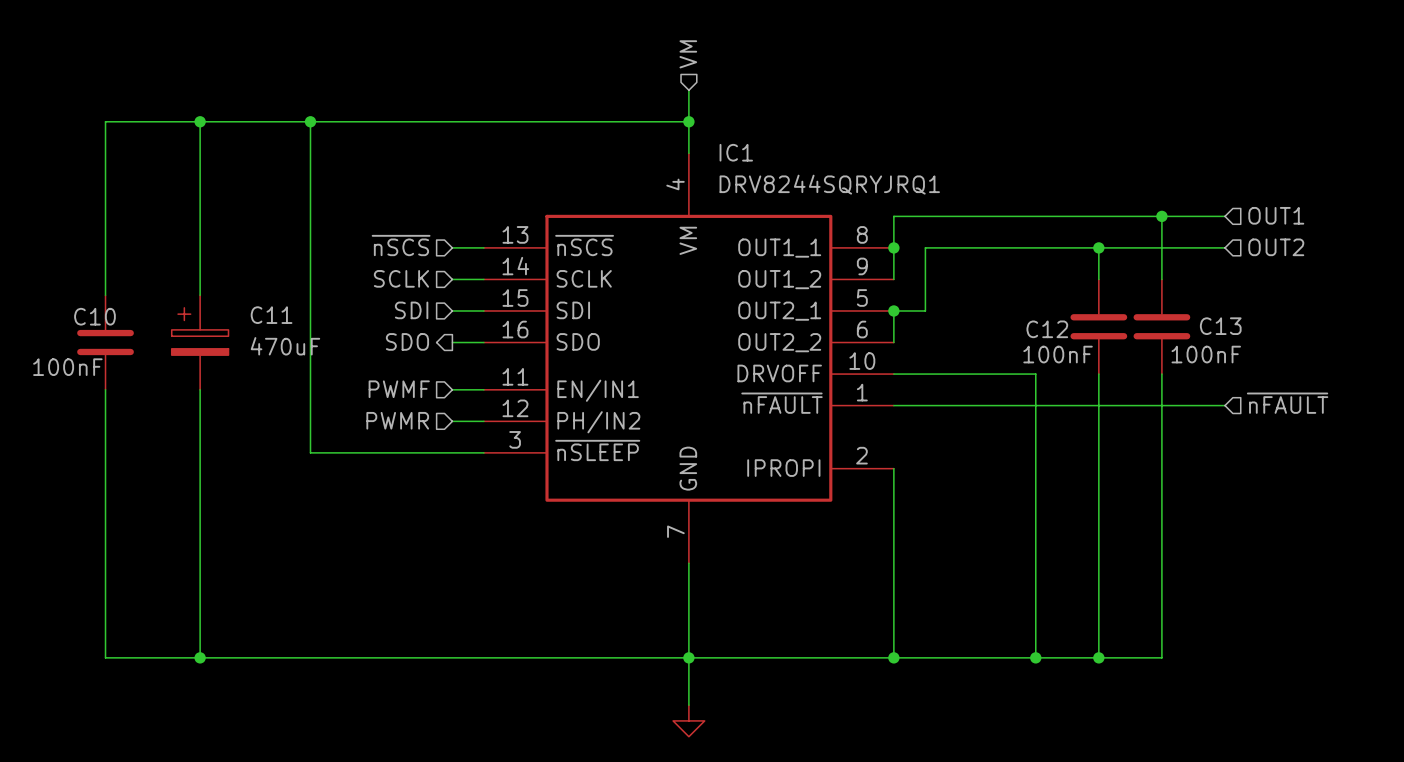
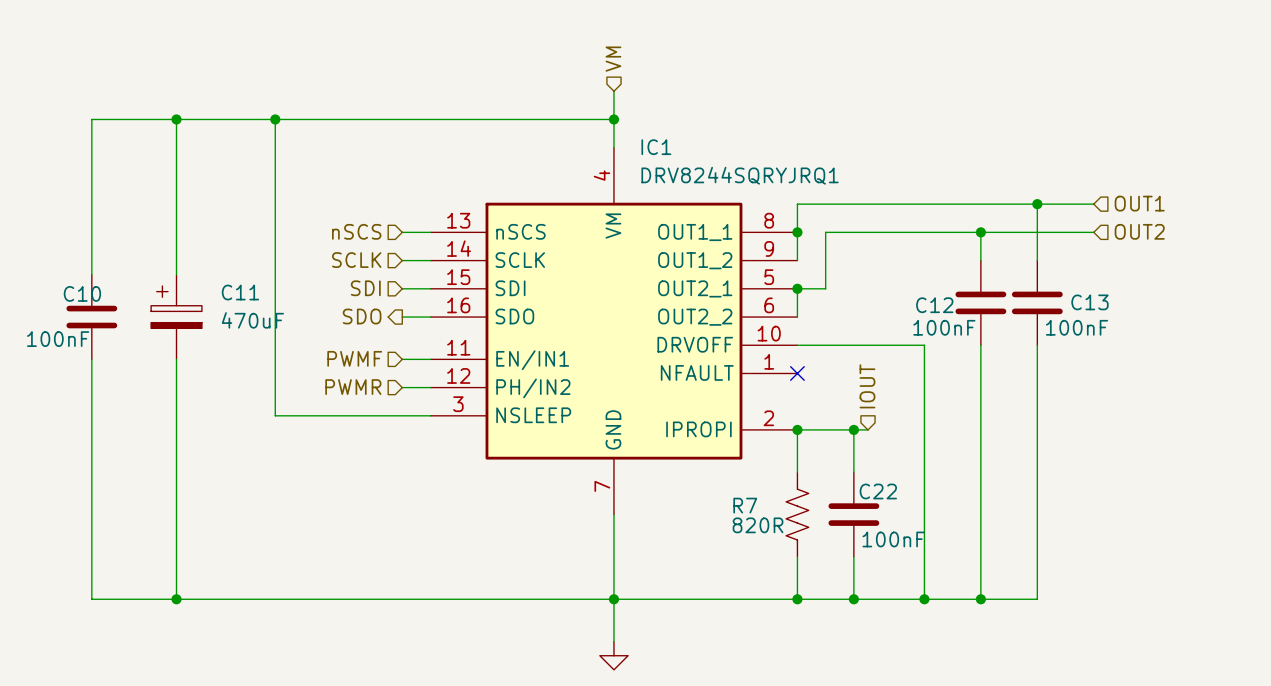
hierarchical label: ~{nSCS} (401, 245) -> nSCS (356, 231)
IC1 pin name: ~{nSCS} (584, 245) -> nSCS (520, 231)
IC1 pin name: ~{nFAULT} (781, 403) -> NFAULT (697, 372)
hierarchical label: ~{nFAULT} (1287, 403) -> none
wire: (893, 405) (1224, 405) -> none
no-connect mark: none -> (797, 373)
hierarchical label: none -> IOUT (867, 386)
IC1 pin name: ~{nSLEEP} (597, 450) -> NSLEEP (533, 415)
wire: none -> (797, 429) (867, 429)
junction: none -> (797, 429)
wire: none -> (853, 429) (853, 472)
junction: none -> (853, 429)
R7: none -> 820R (797, 514)
C22: none -> 100nF (853, 514)
wire: none -> (853, 556) (853, 599)
junction: none -> (853, 599)

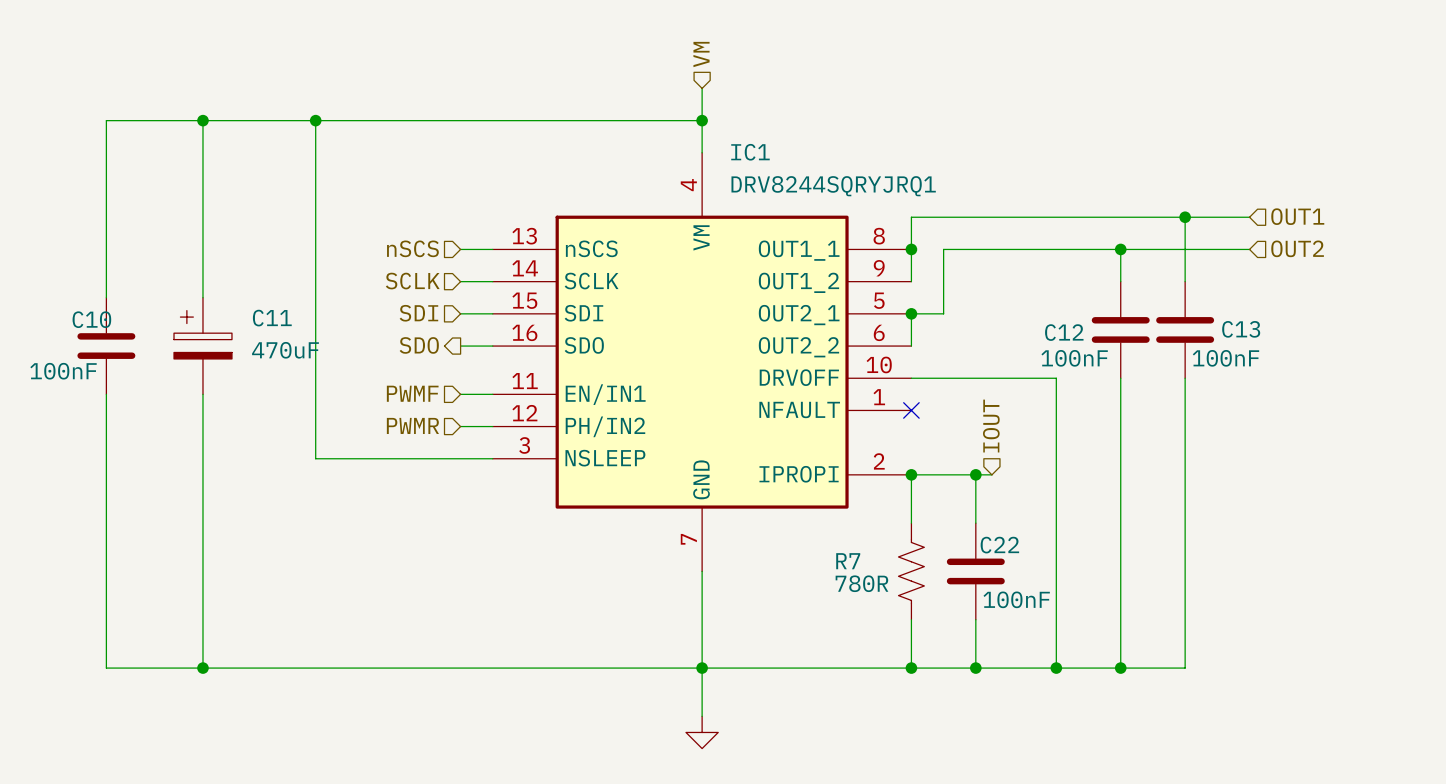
R7 value: 820R (758, 525) -> 780R (861, 583)

